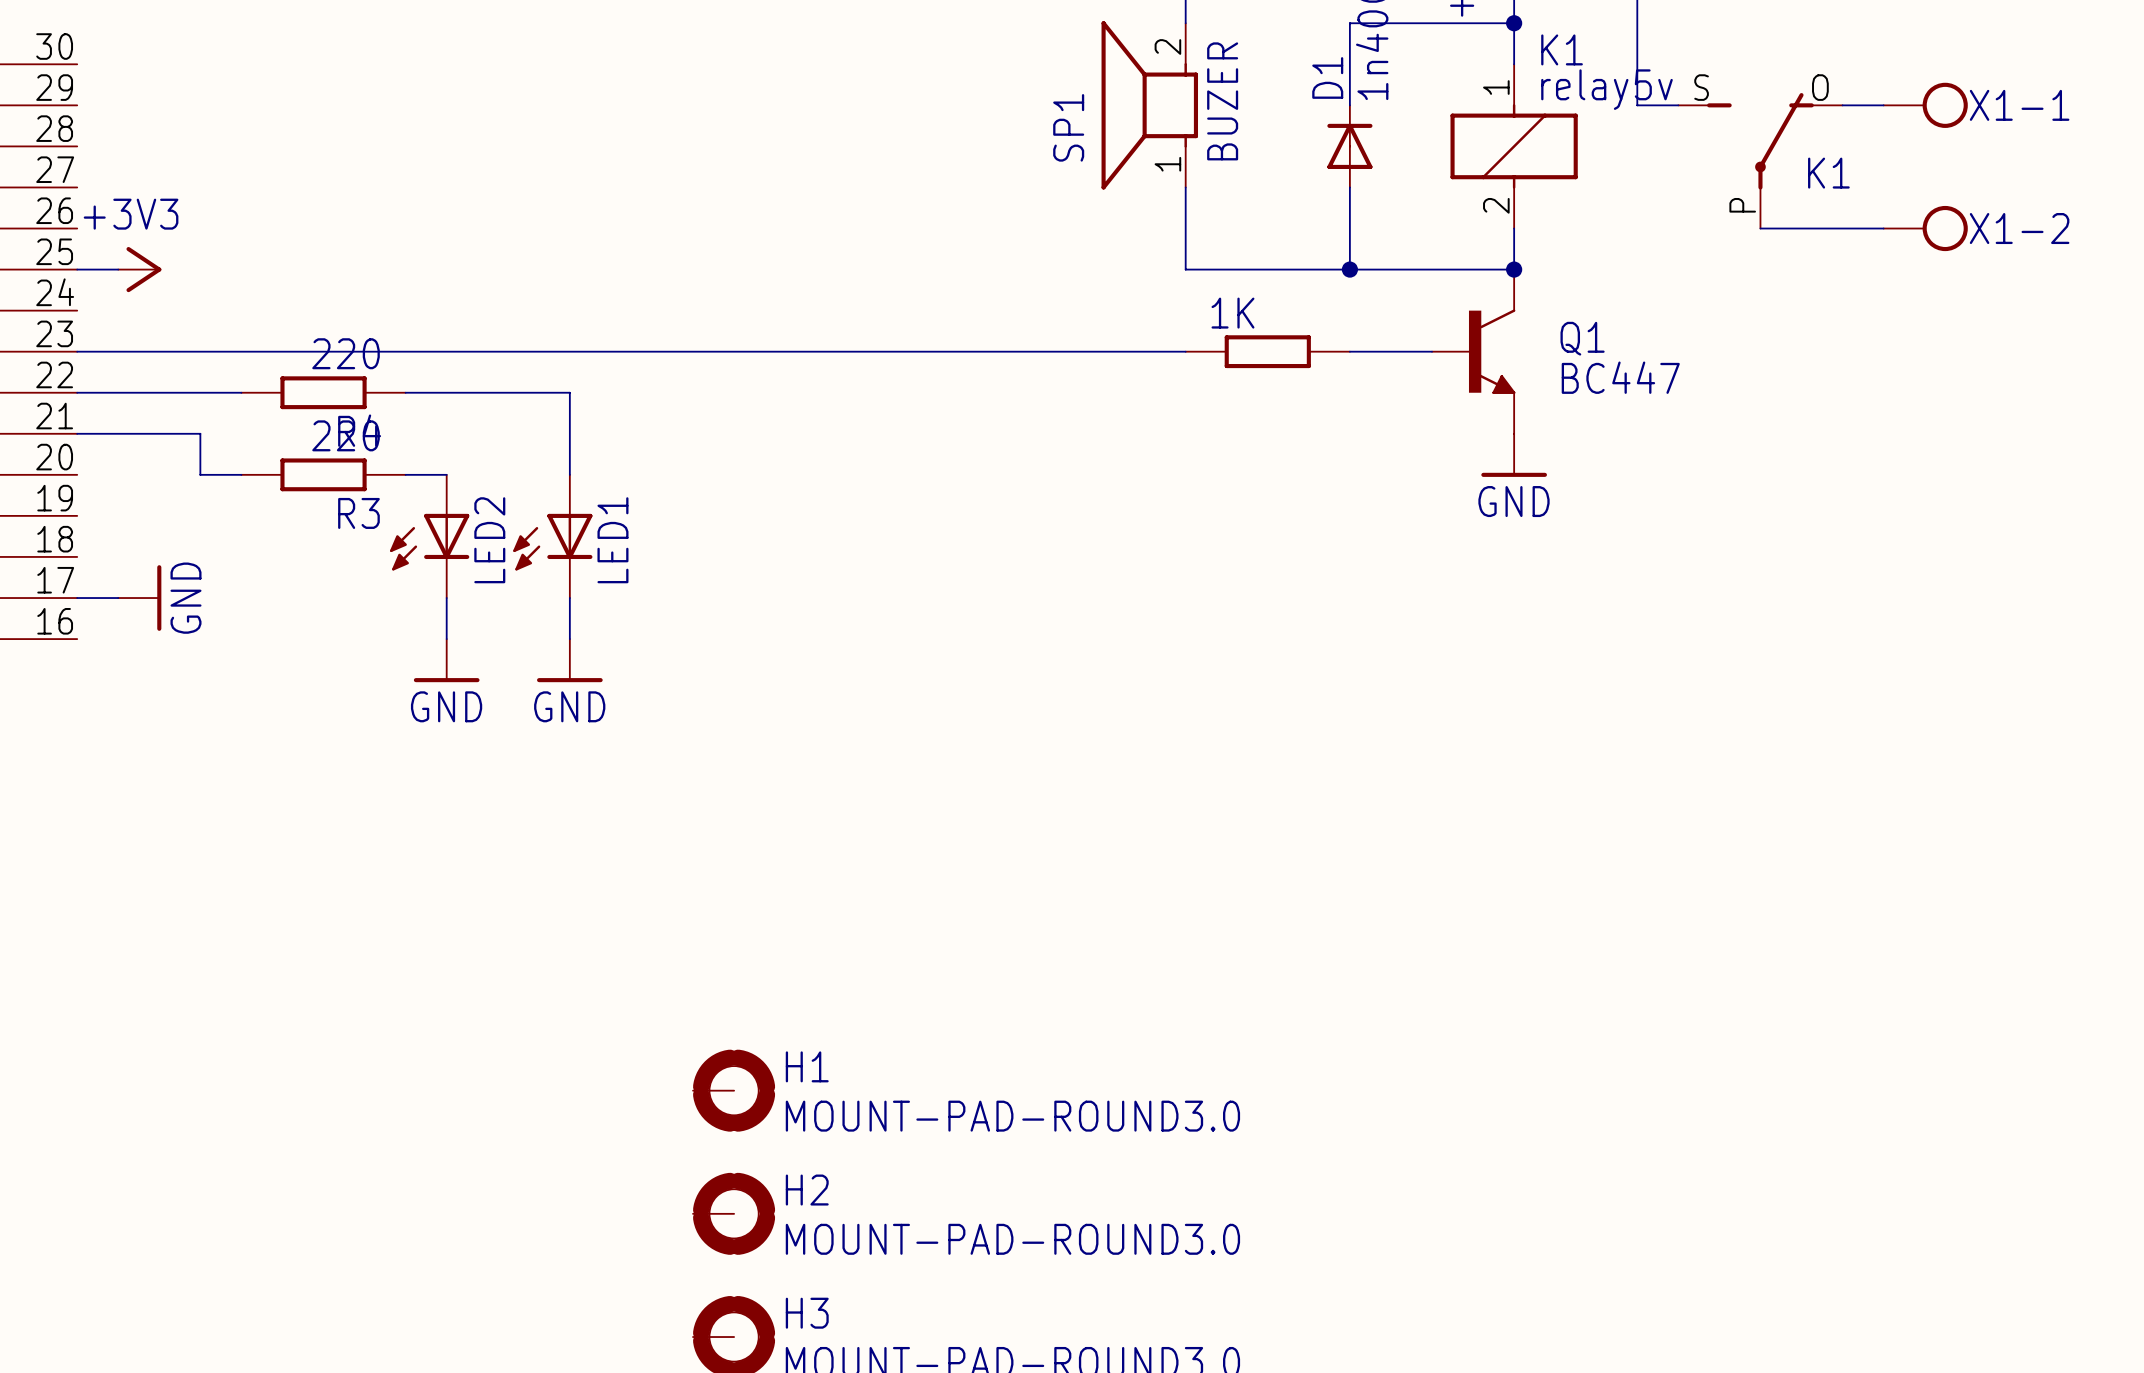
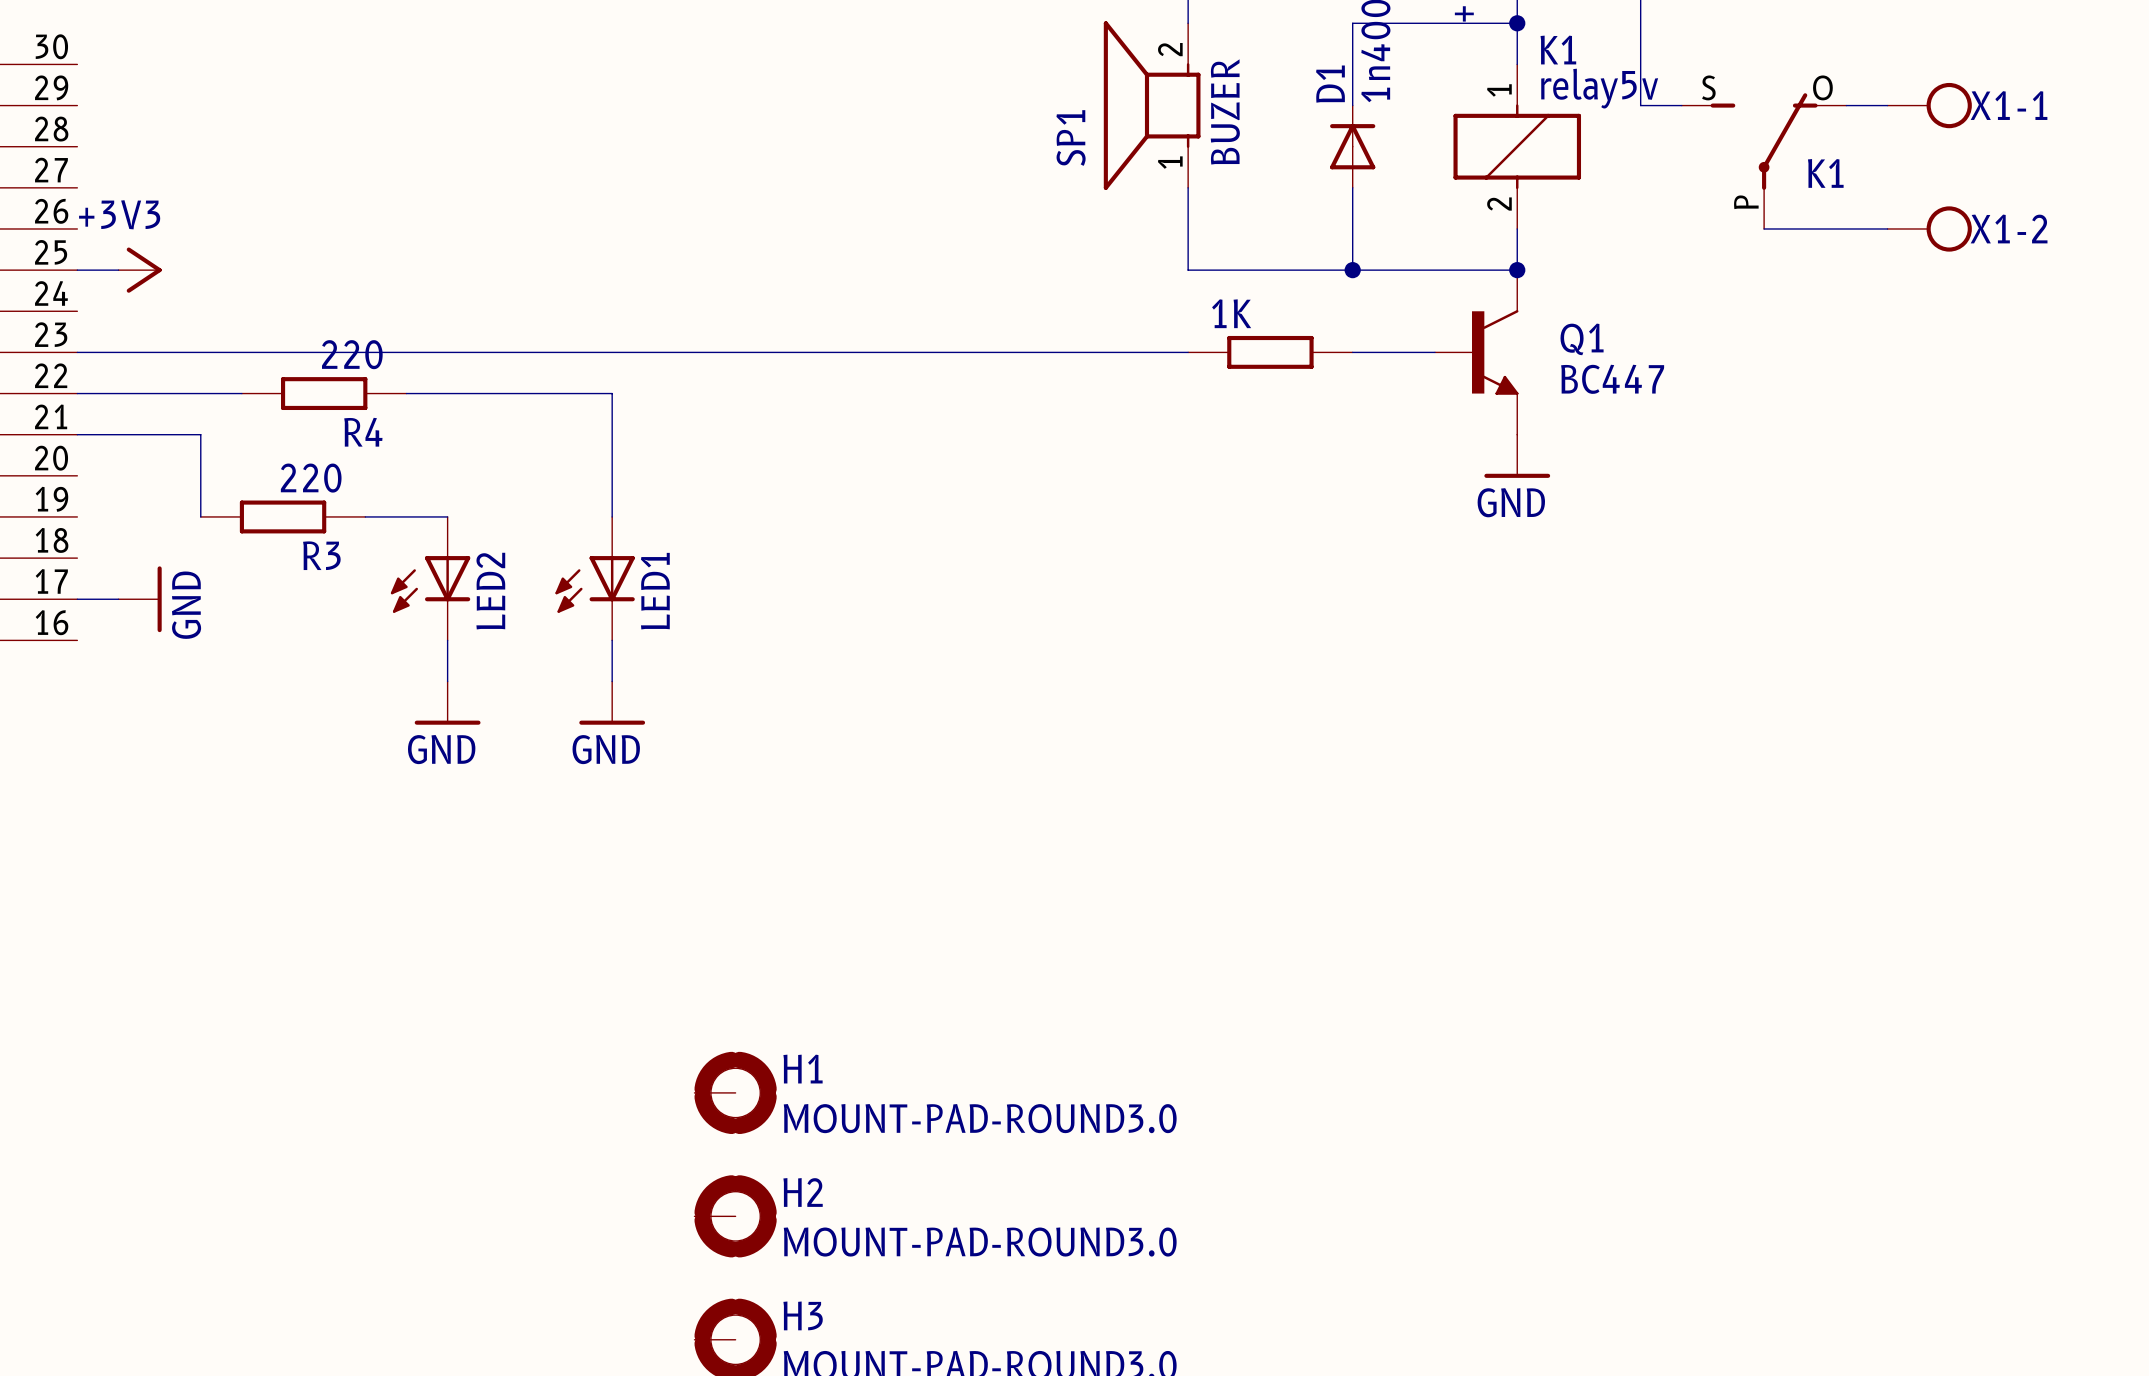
wire: (569, 392) (569, 474) -> (571, 393) (612, 393) (612, 516)
wire: (200, 474) (241, 474) -> (200, 475) (200, 516)
R3 position: (323, 474) -> (283, 516)
wire: (405, 474) (446, 474) -> none
wire: none -> (365, 516) (447, 516)
LED2 position: (429, 536) -> (430, 578)
LED1 position: (552, 536) -> (595, 578)
wire: (569, 598) (569, 639) -> (612, 640) (612, 681)
power symbol position: GND (446, 660) -> GND (447, 703)
power symbol position: GND (569, 660) -> GND (612, 703)

